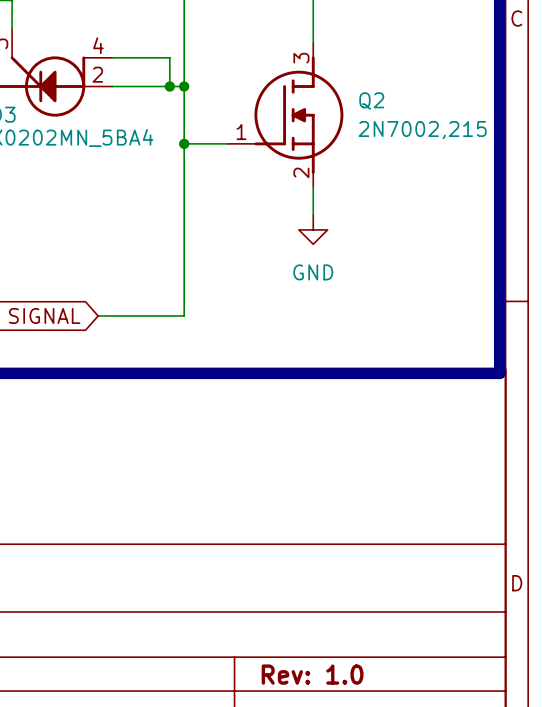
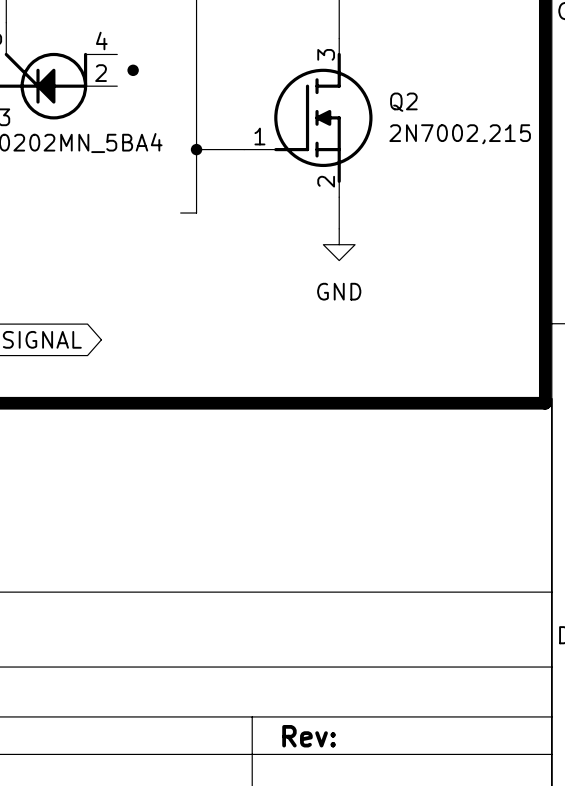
wire: (112, 57) (169, 57) (169, 86) -> none
junction: none -> (133, 70)
wire: (112, 86) (184, 86) -> none
junction: (169, 86) -> none
junction: (184, 86) -> none
wire: (184, 201) (184, 315) (98, 315) -> (196, 213) (180, 213)
title block: Rev: 1.0 (312, 674) -> Rev: (309, 736)

